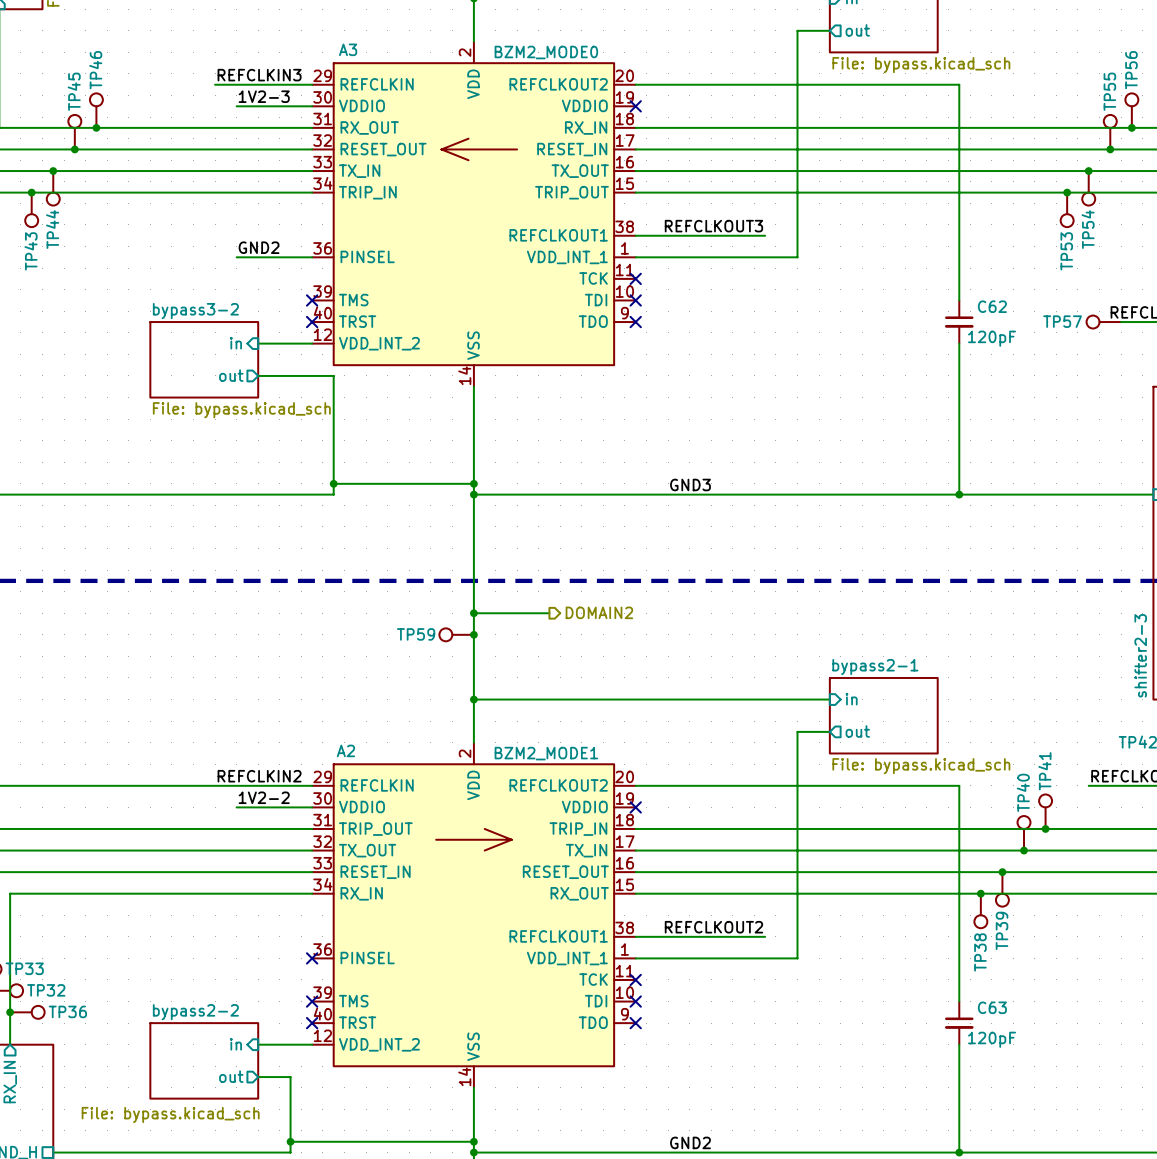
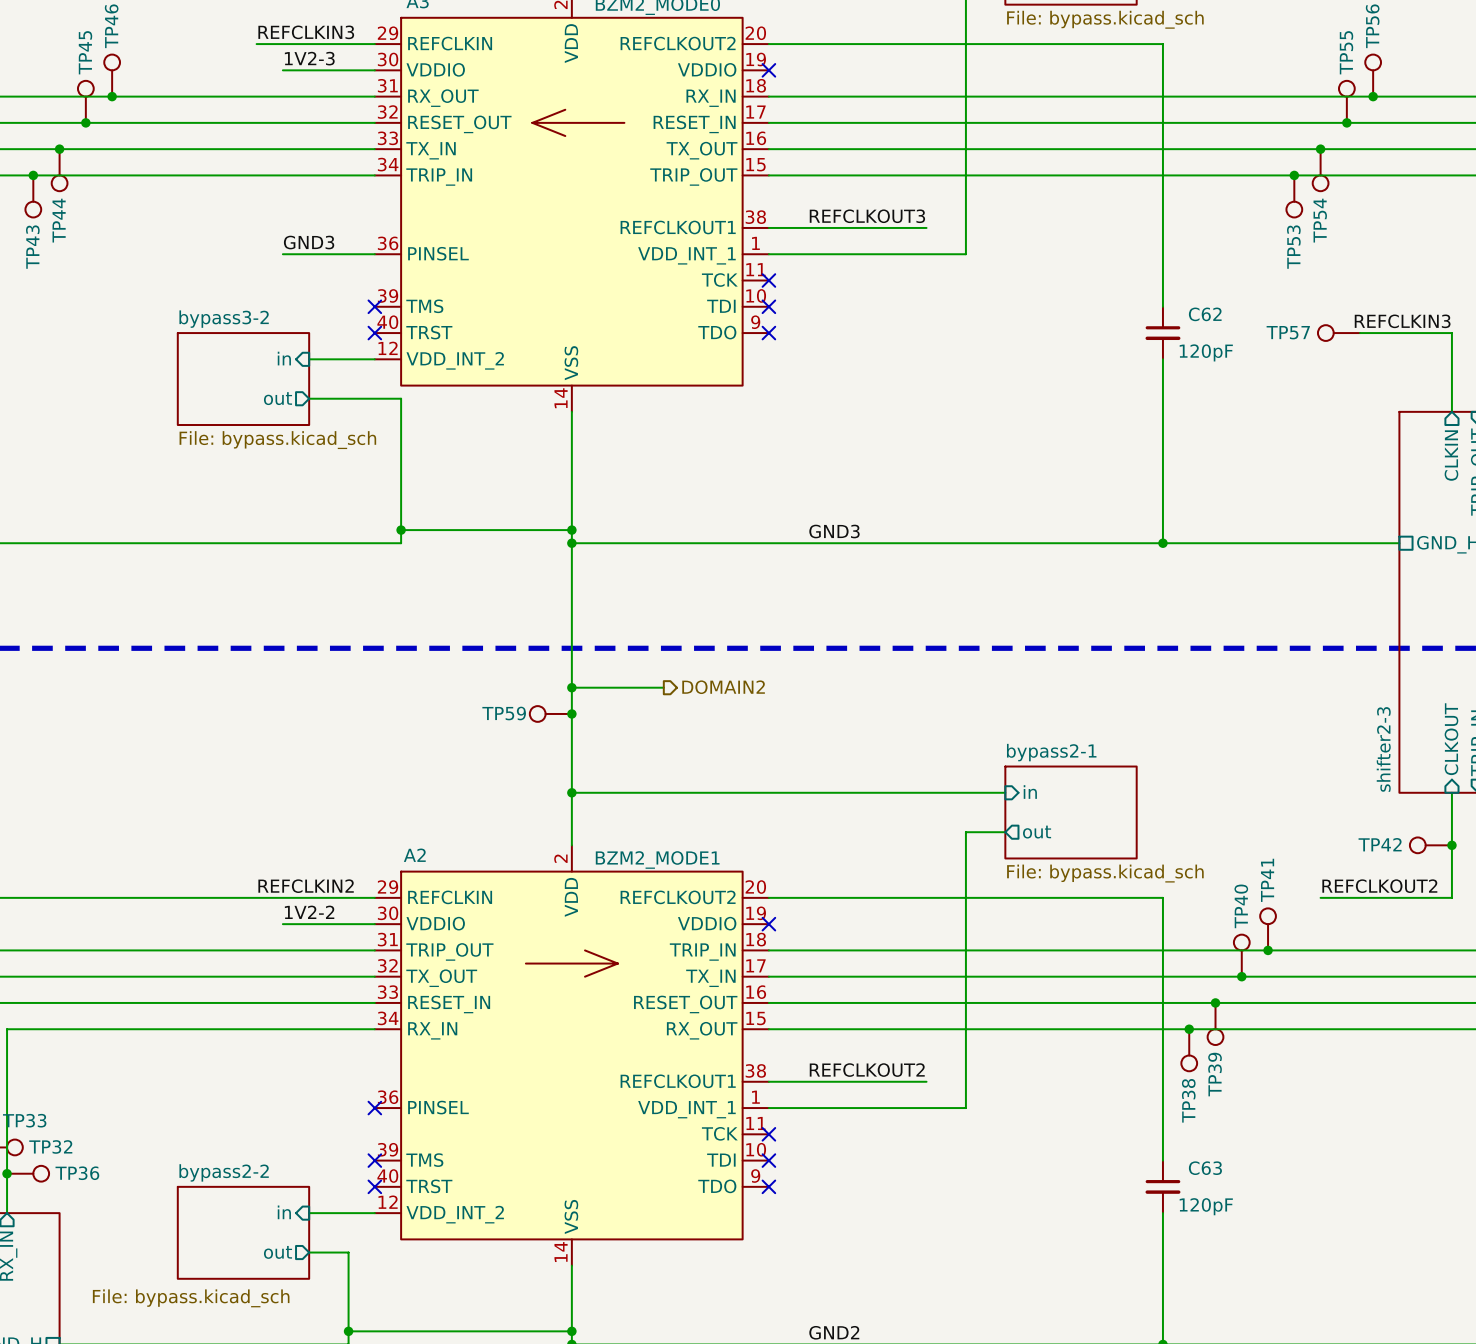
label: GND2 (259, 247) -> GND3 (309, 242)

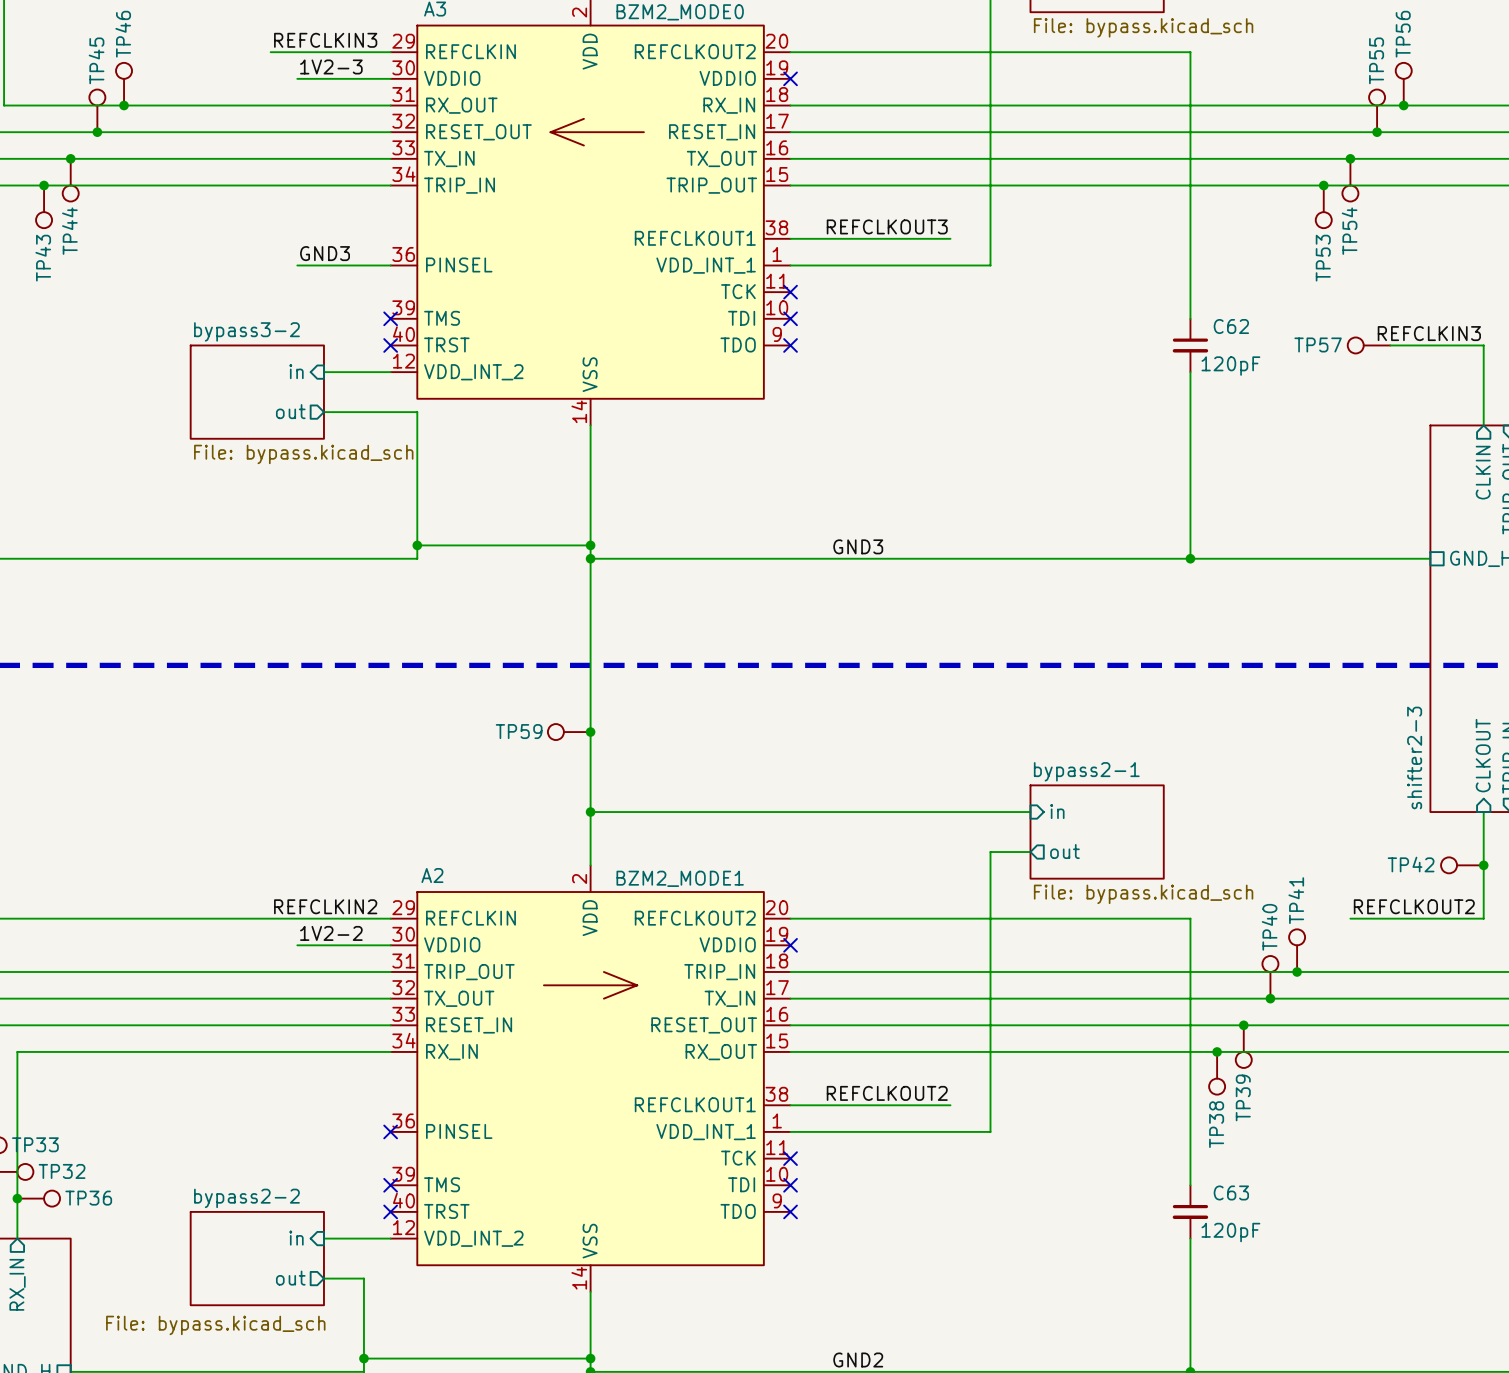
wire: (571, 687) (663, 687) -> none
junction: (571, 687) -> none
hierarchical label: DOMAIN2 (723, 687) -> none

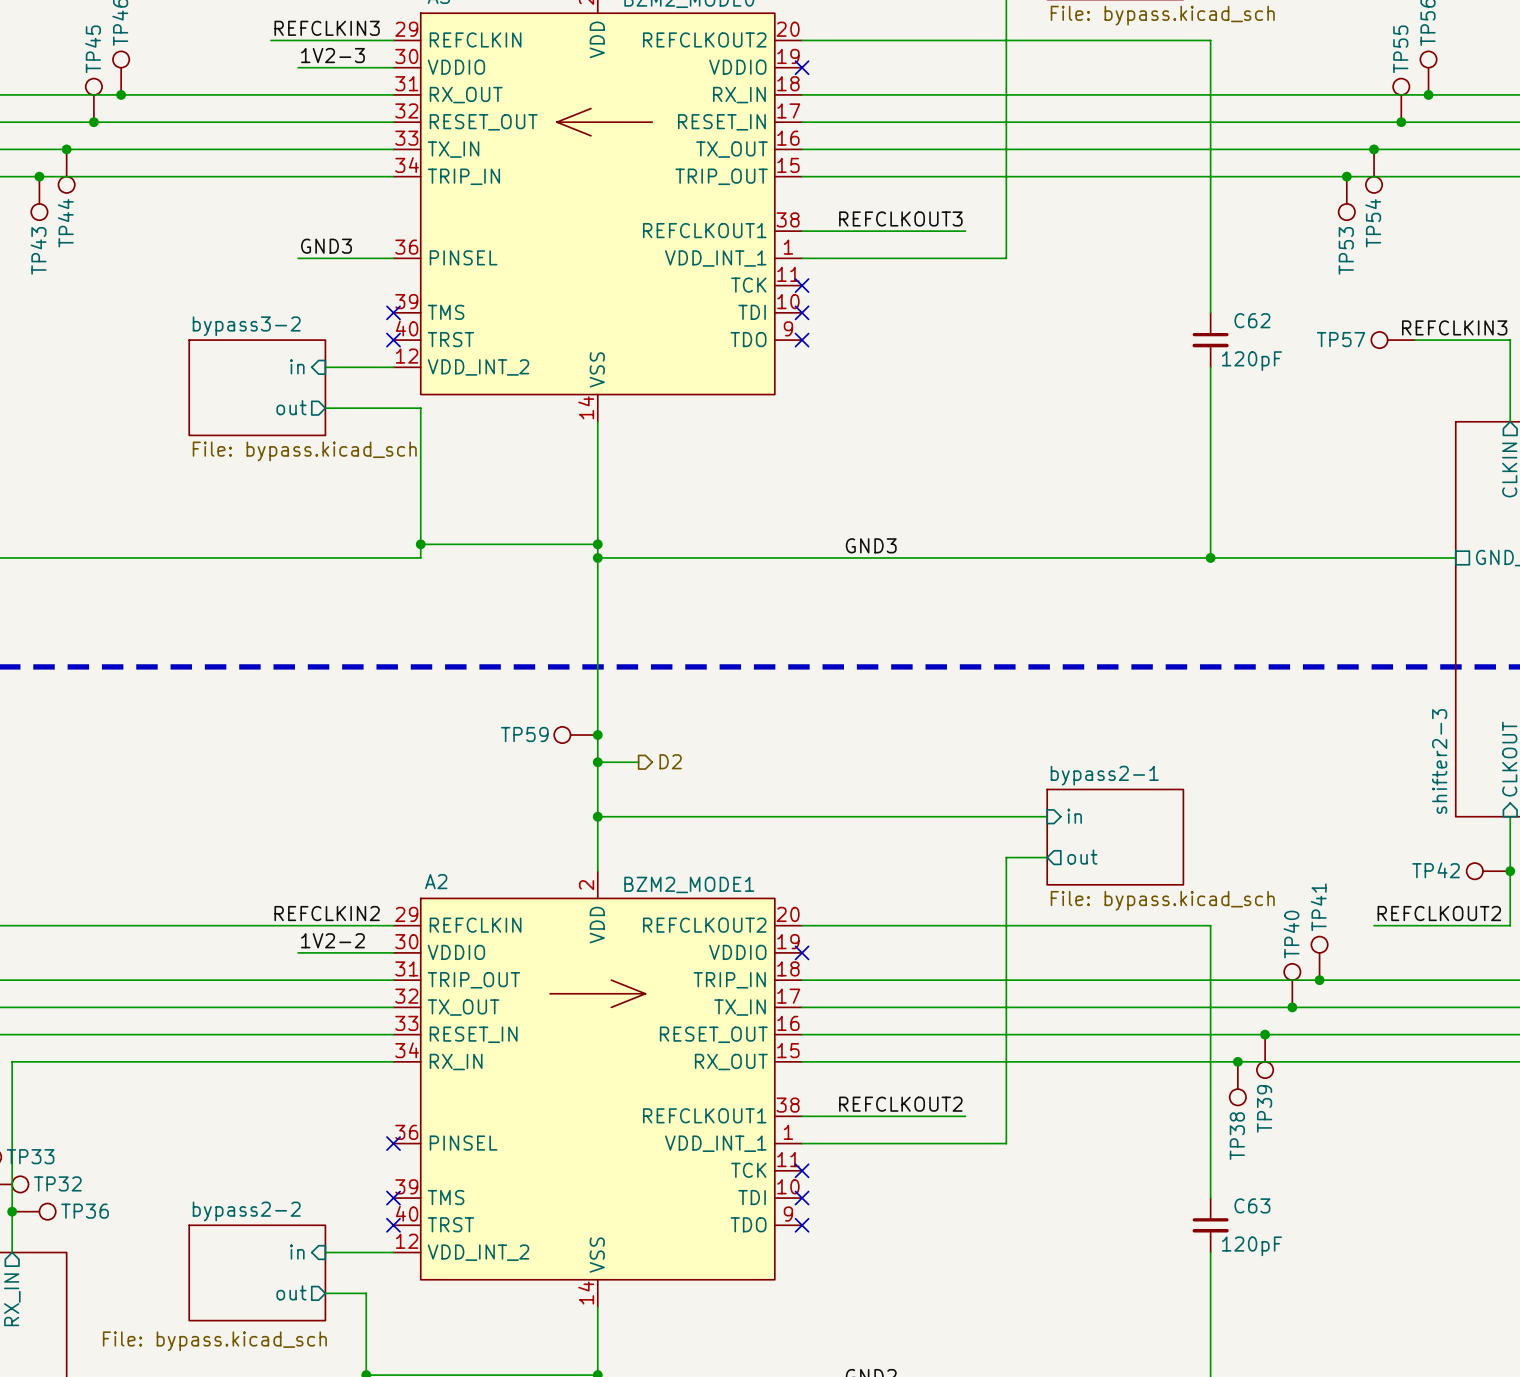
wire: none -> (597, 762) (638, 762)
junction: none -> (597, 762)
hierarchical label: none -> D2 (670, 761)

